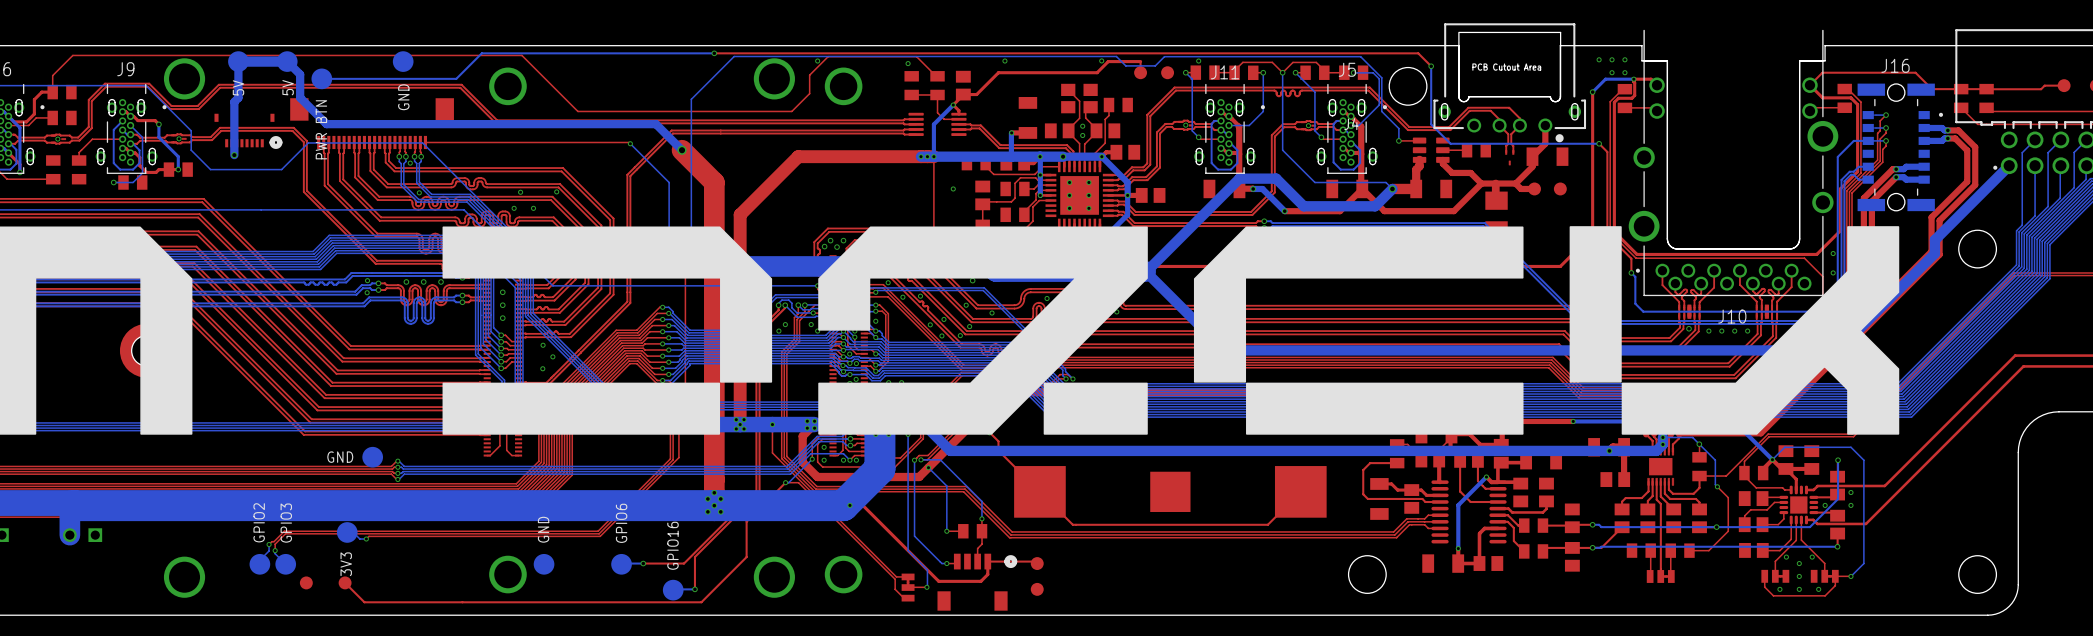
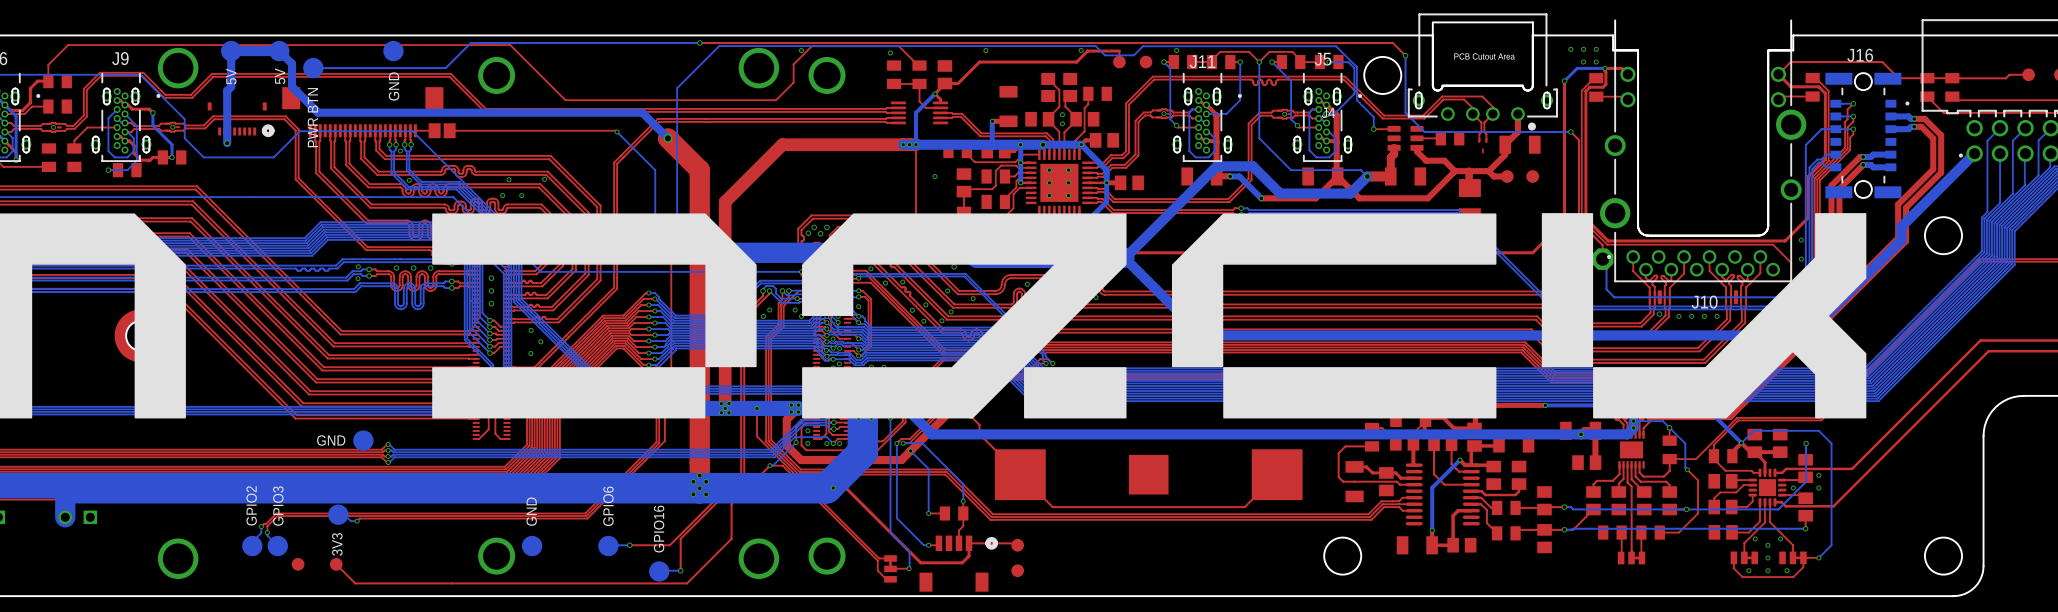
part: none -> (442, 130)
top track: (460, 142) (445, 142) -> none
via: (1631, 272) -> none
part: none -> (1602, 259)

